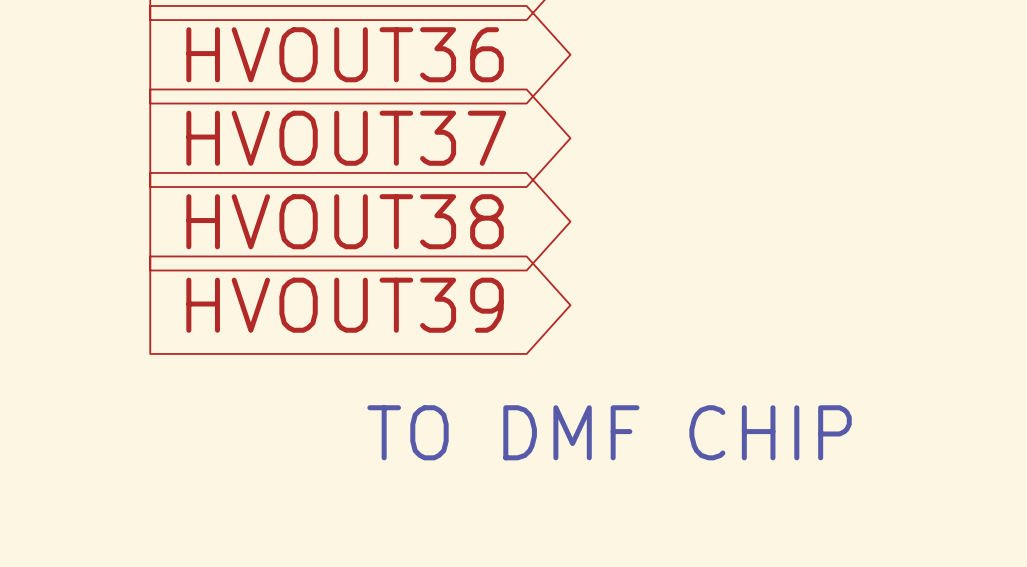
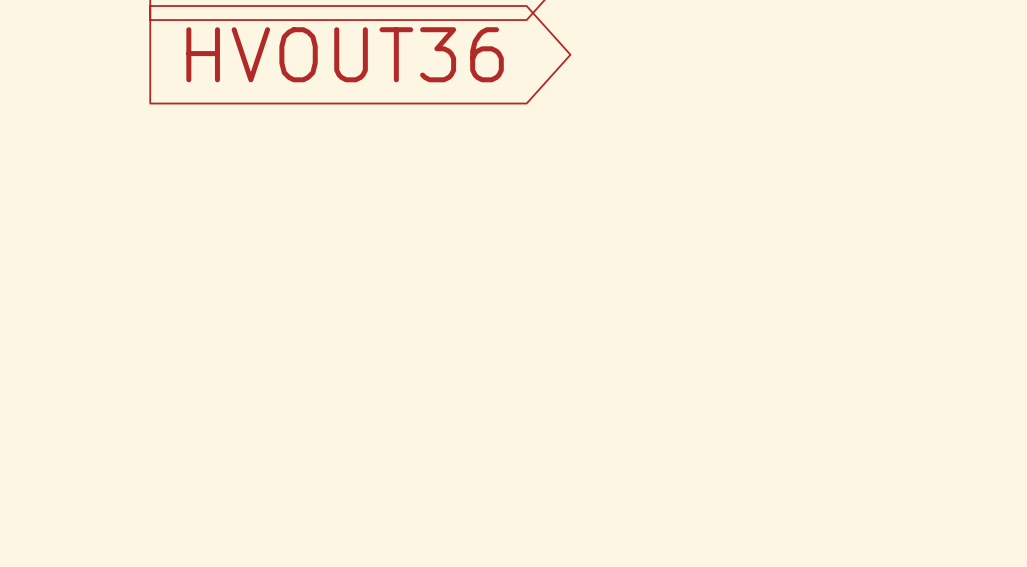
global label: HVOUT37 (346, 138) -> none
global label: HVOUT38 (345, 221) -> none
global label: HVOUT39 (345, 305) -> none
text: TO DMF CHIP (609, 432) -> none

